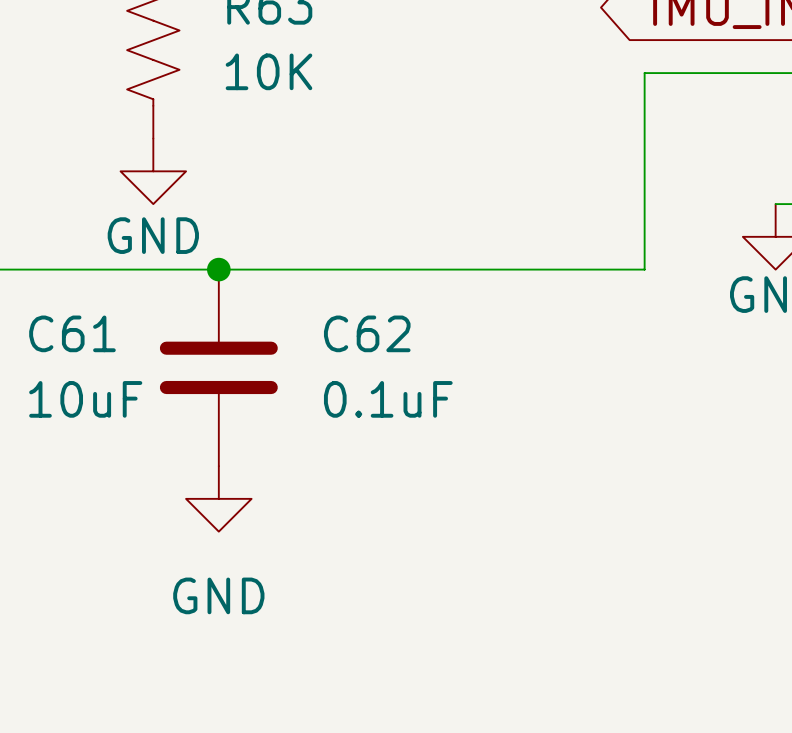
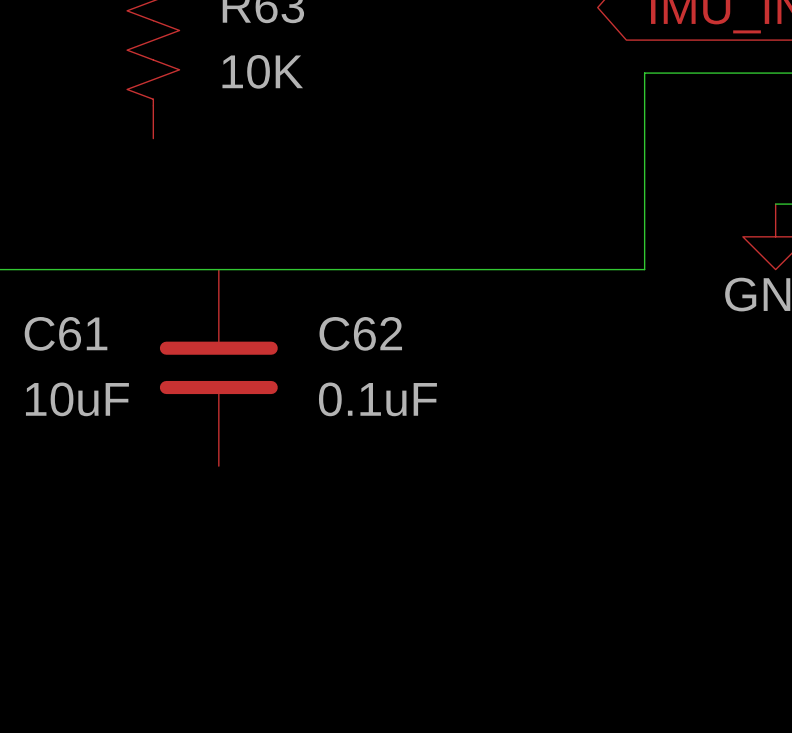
power symbol: GND (153, 171) -> none
junction: (218, 269) -> none
power symbol: GND (218, 498) -> none

